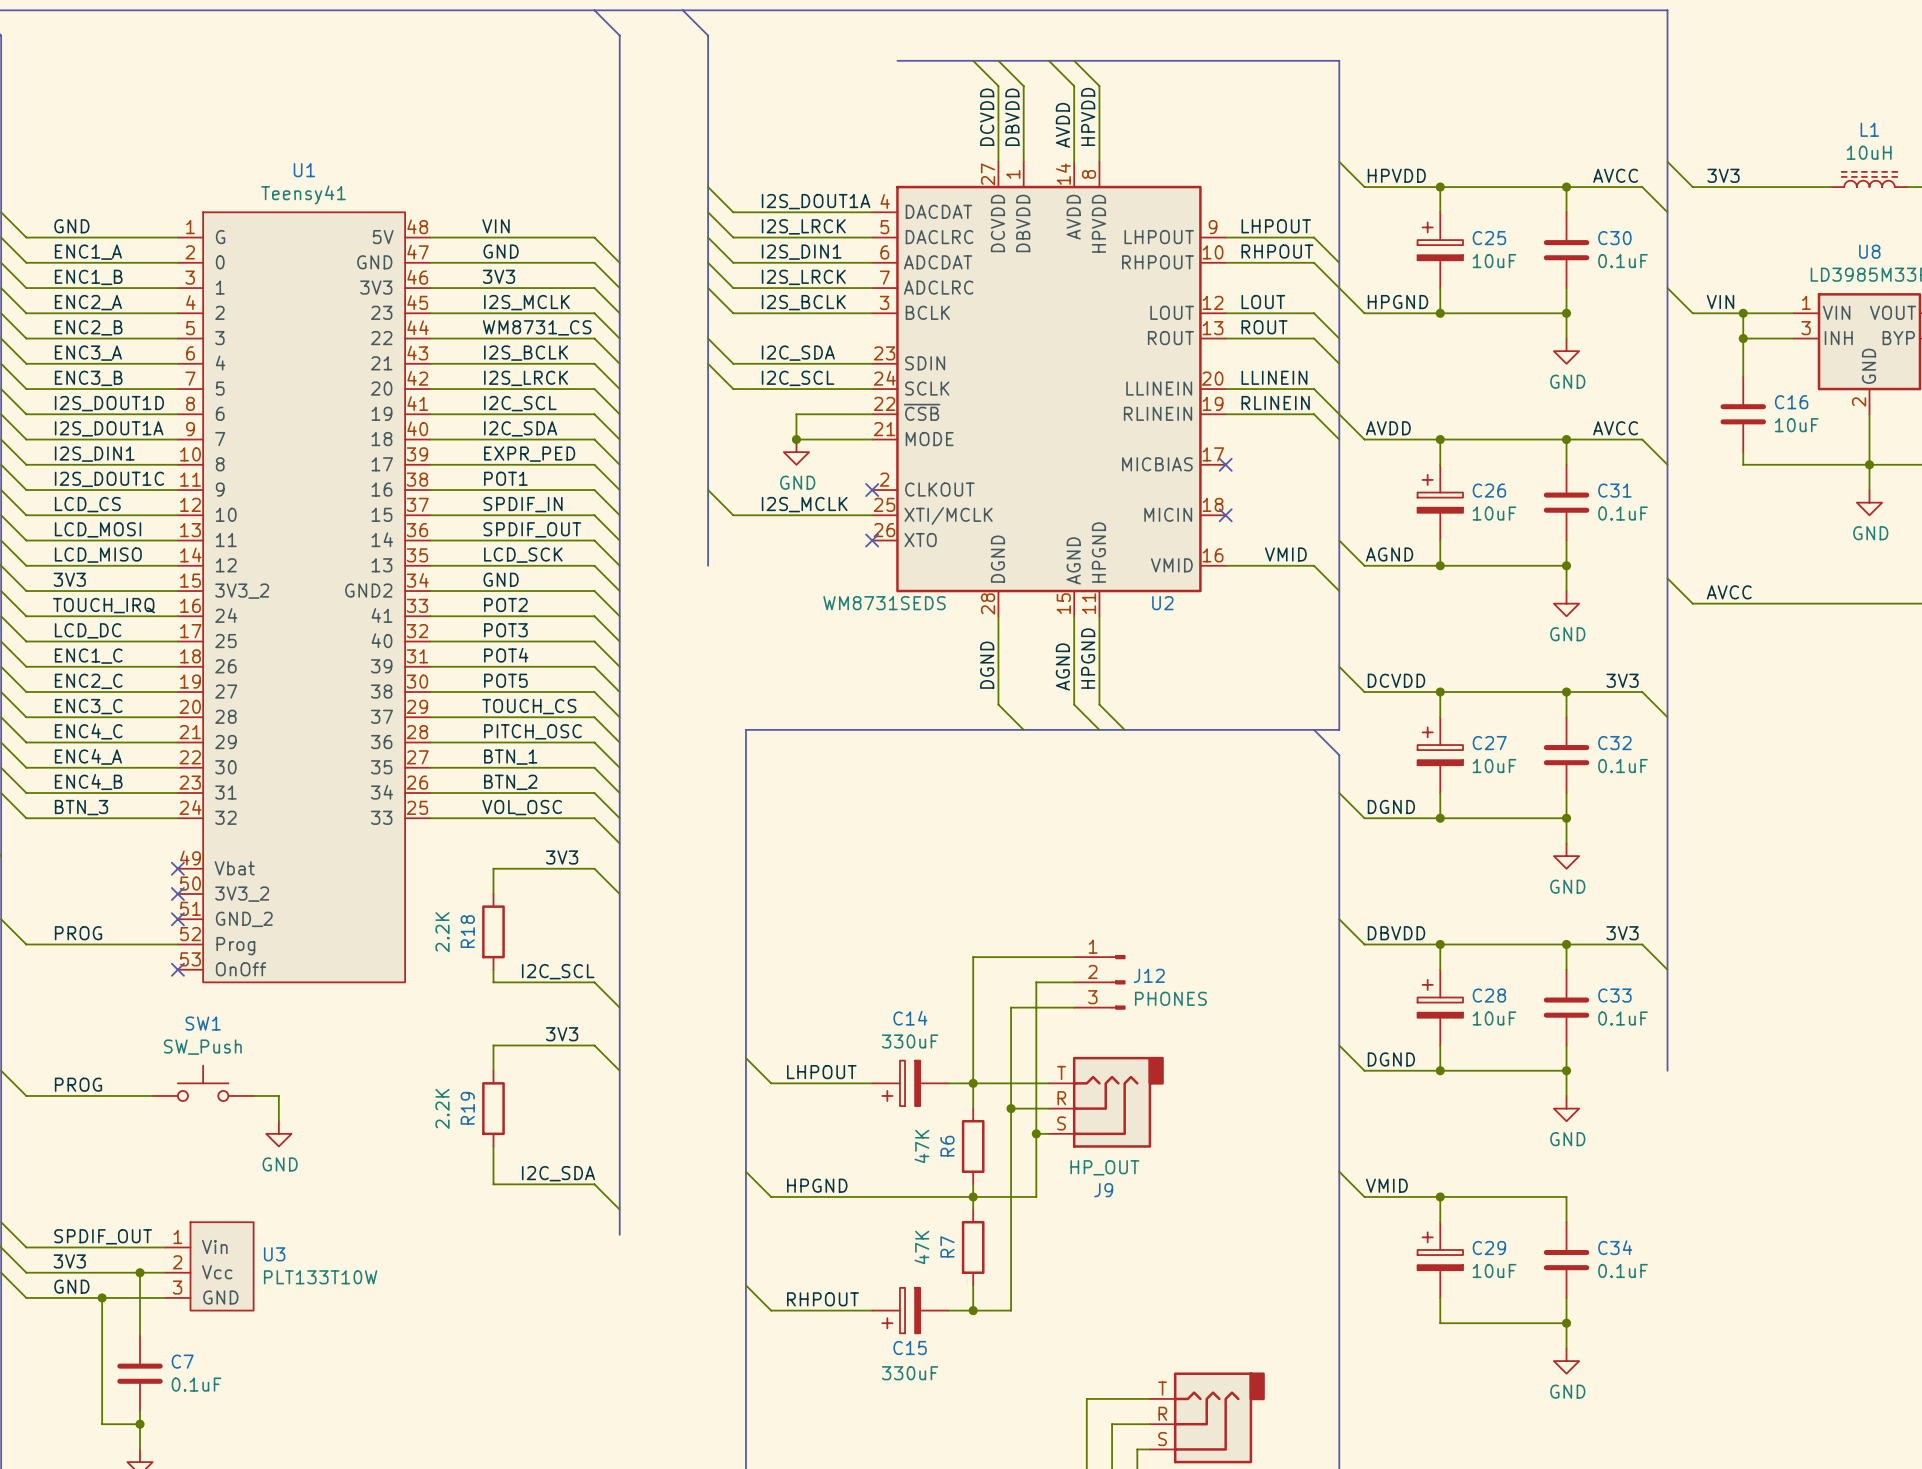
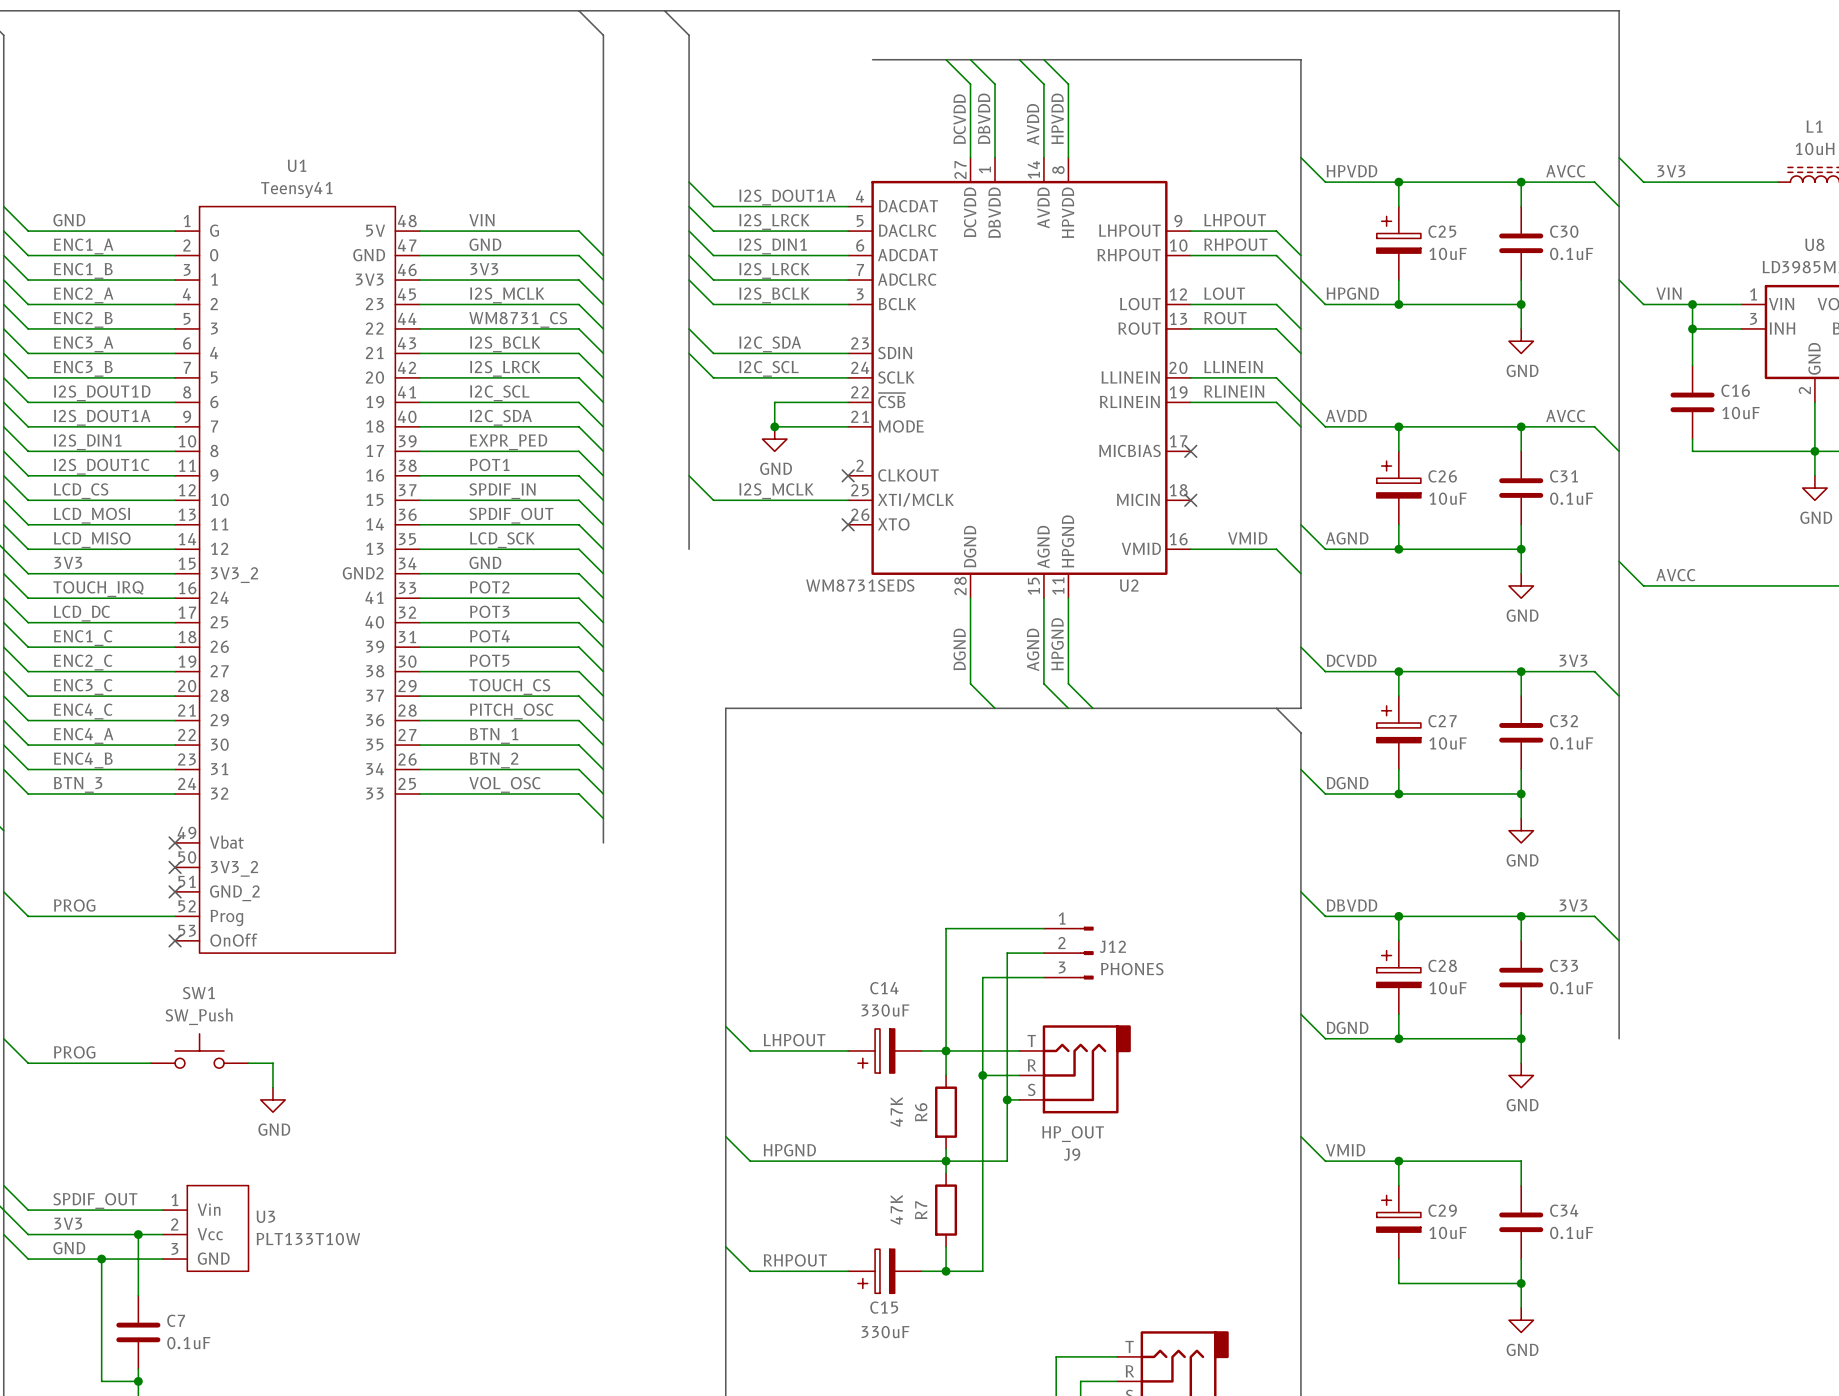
label: 3V3 (562, 857) -> none
bus: (619, 868) (619, 1234) -> none
wire: (493, 894) (493, 868) (594, 868) (619, 894) -> none
R18: 2.2K (493, 931) -> none
wire: (493, 969) (493, 982) (594, 982) (619, 1007) -> none
label: I2C_SCL (558, 971) -> none
label: 3V3 (562, 1034) -> none
wire: (493, 1070) (493, 1045) (594, 1045) (619, 1070) -> none
R19: 2.2K (493, 1108) -> none
wire: (493, 1146) (493, 1184) (594, 1184) (619, 1209) -> none
label: I2C_SDA (558, 1173) -> none

